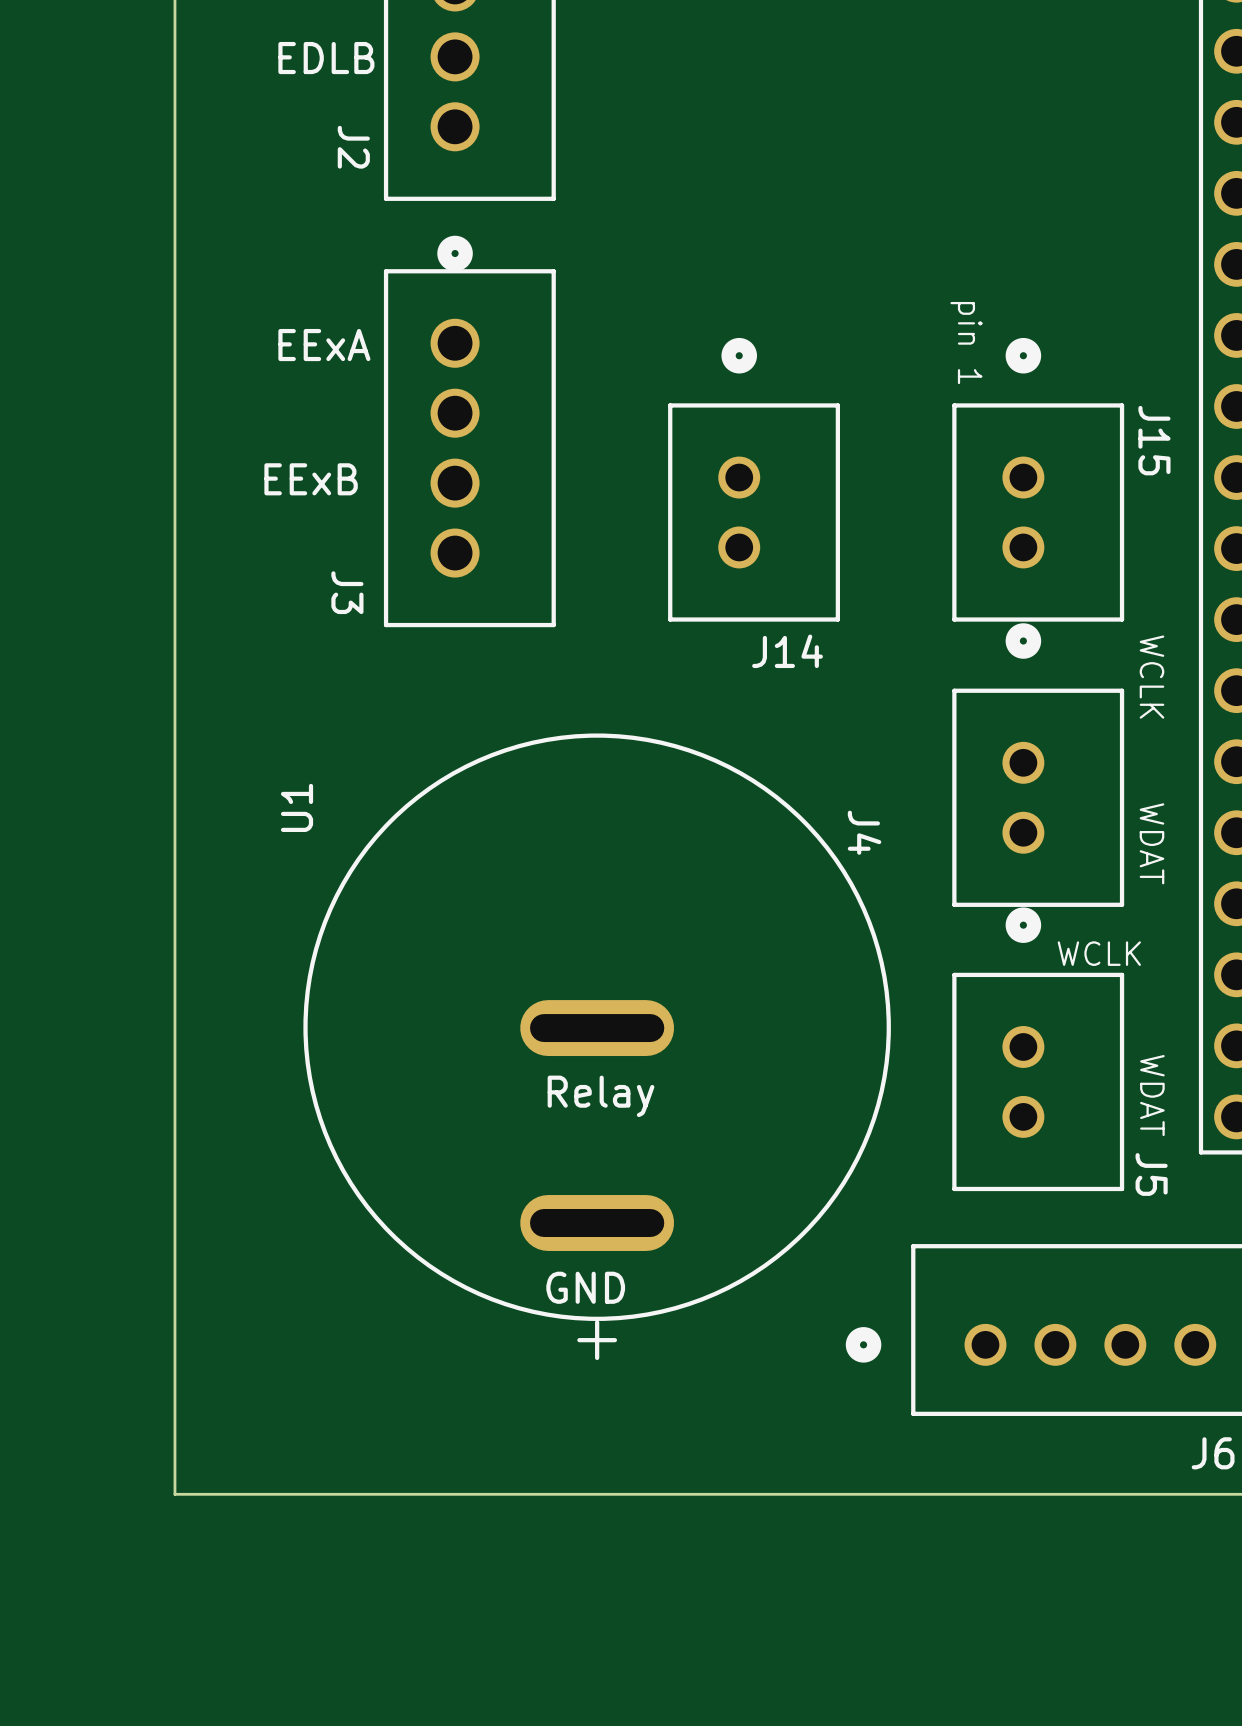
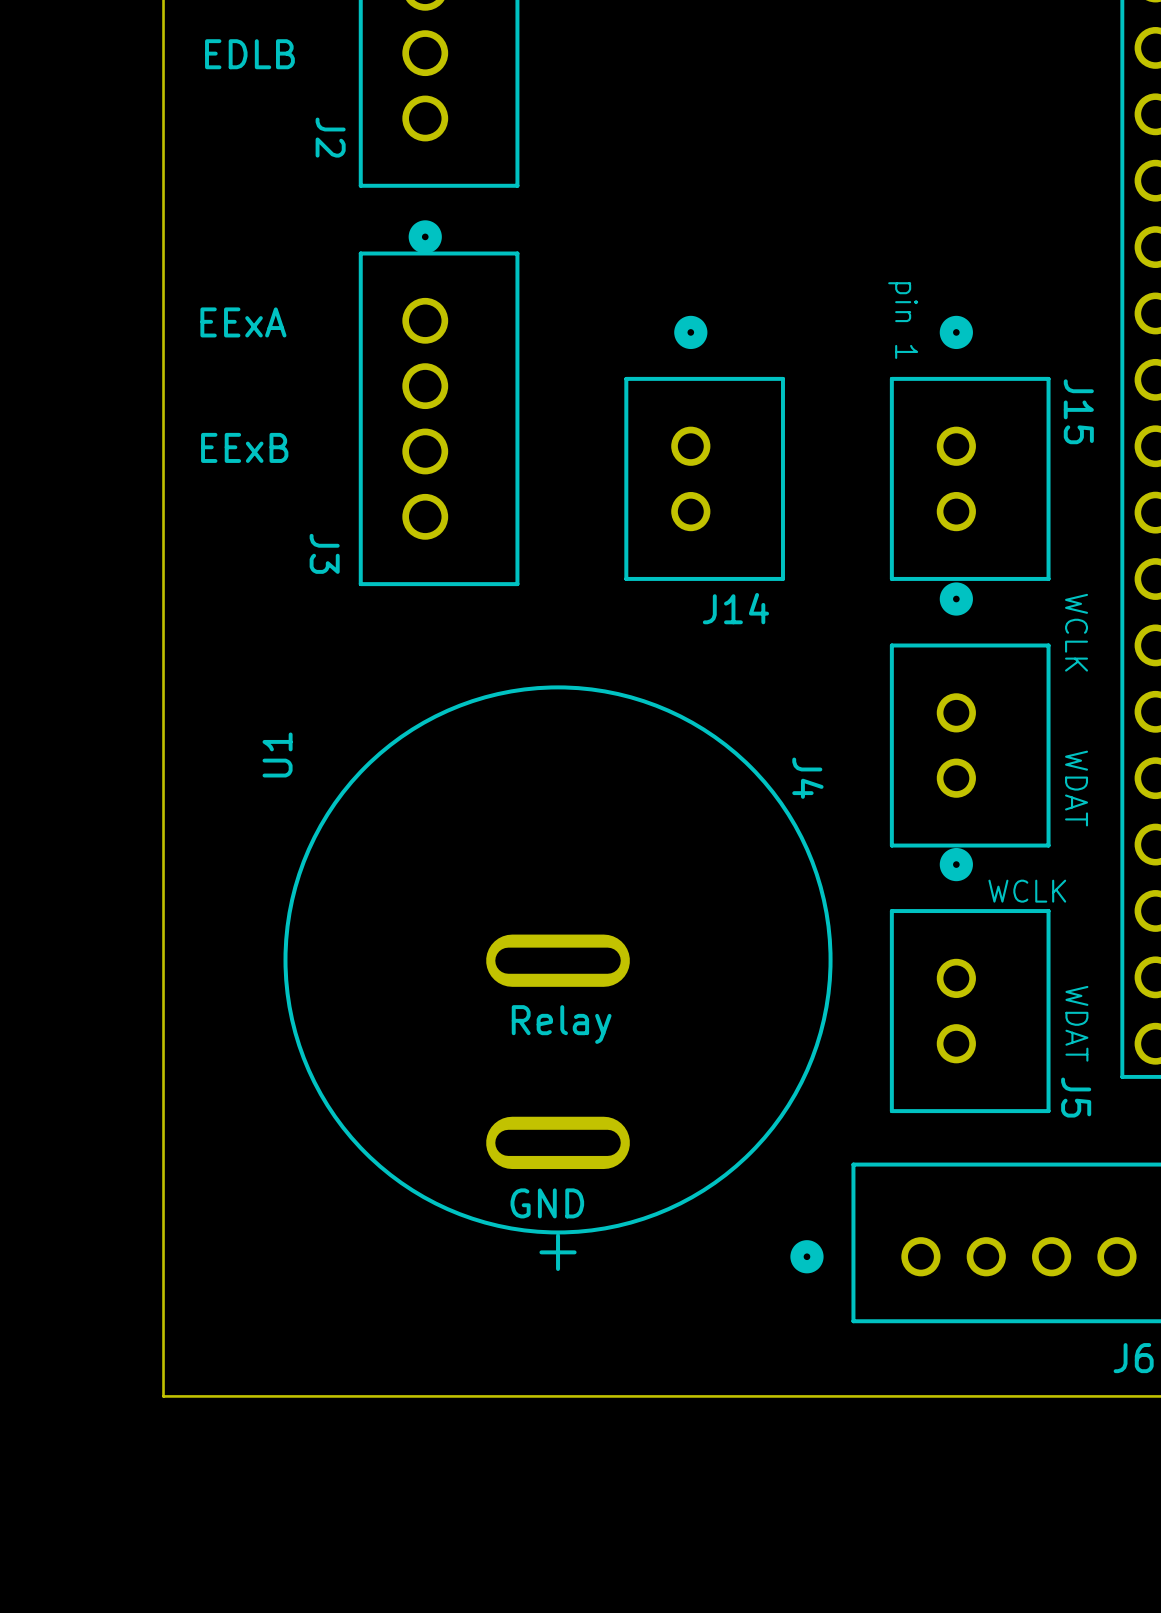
text position: EDLB (326, 58) -> EDLB (249, 54)
text position: EExA (324, 345) -> EExA (243, 322)
text position: EExB (311, 479) -> EExB (244, 447)

